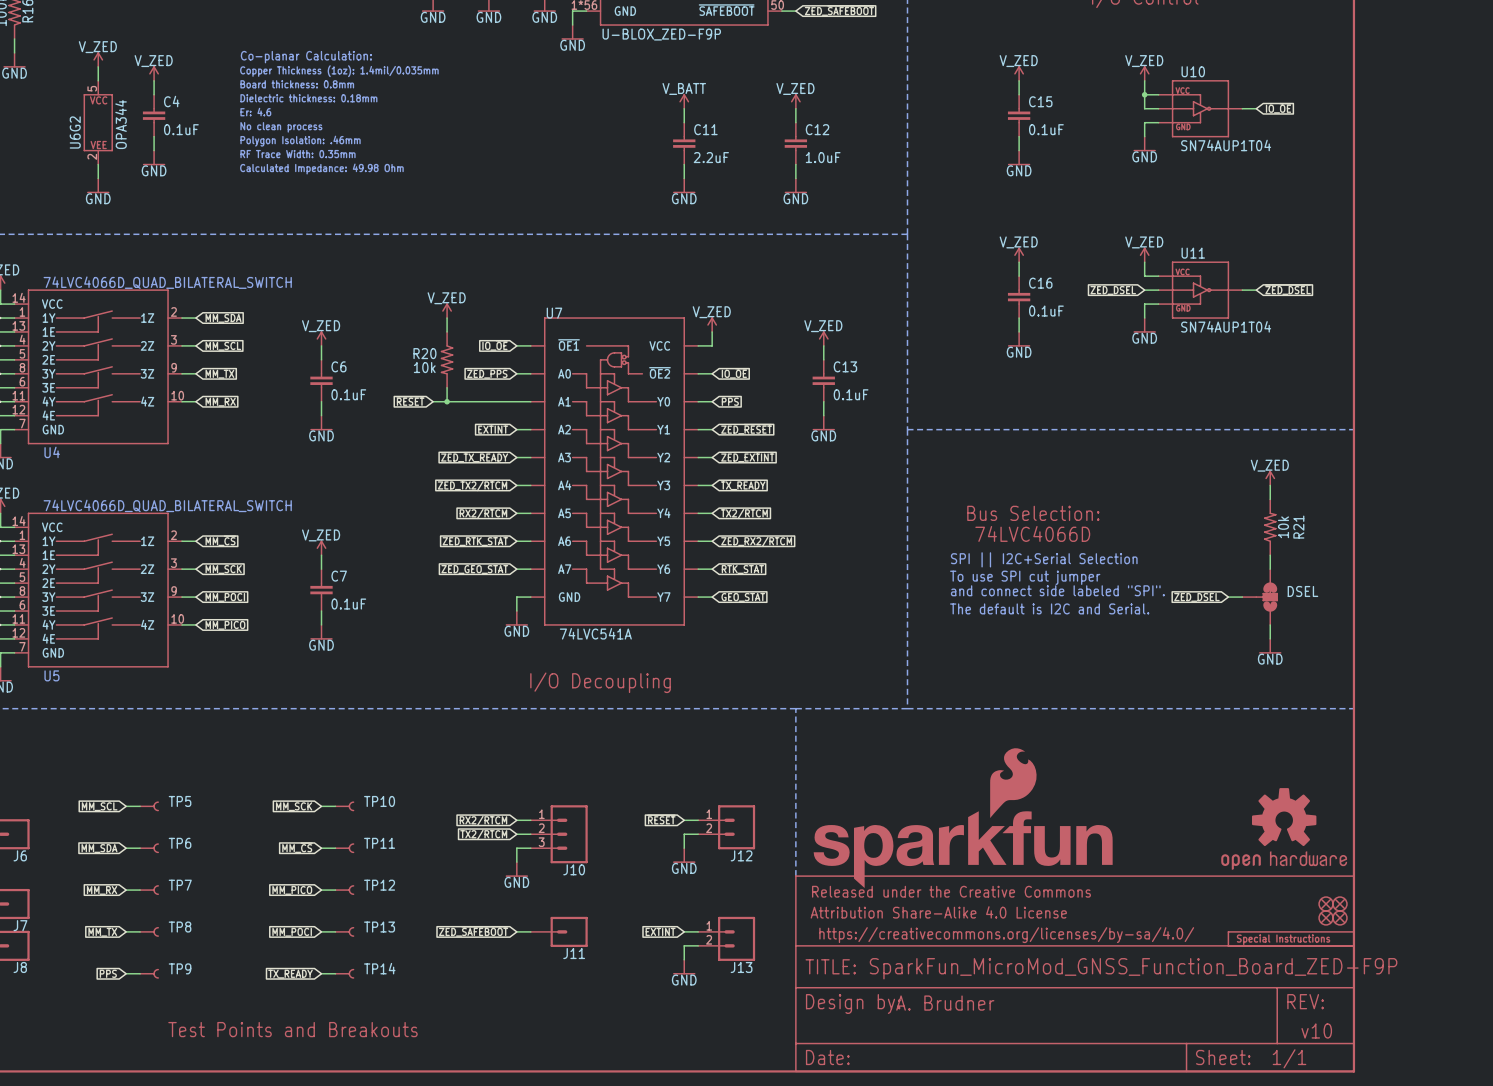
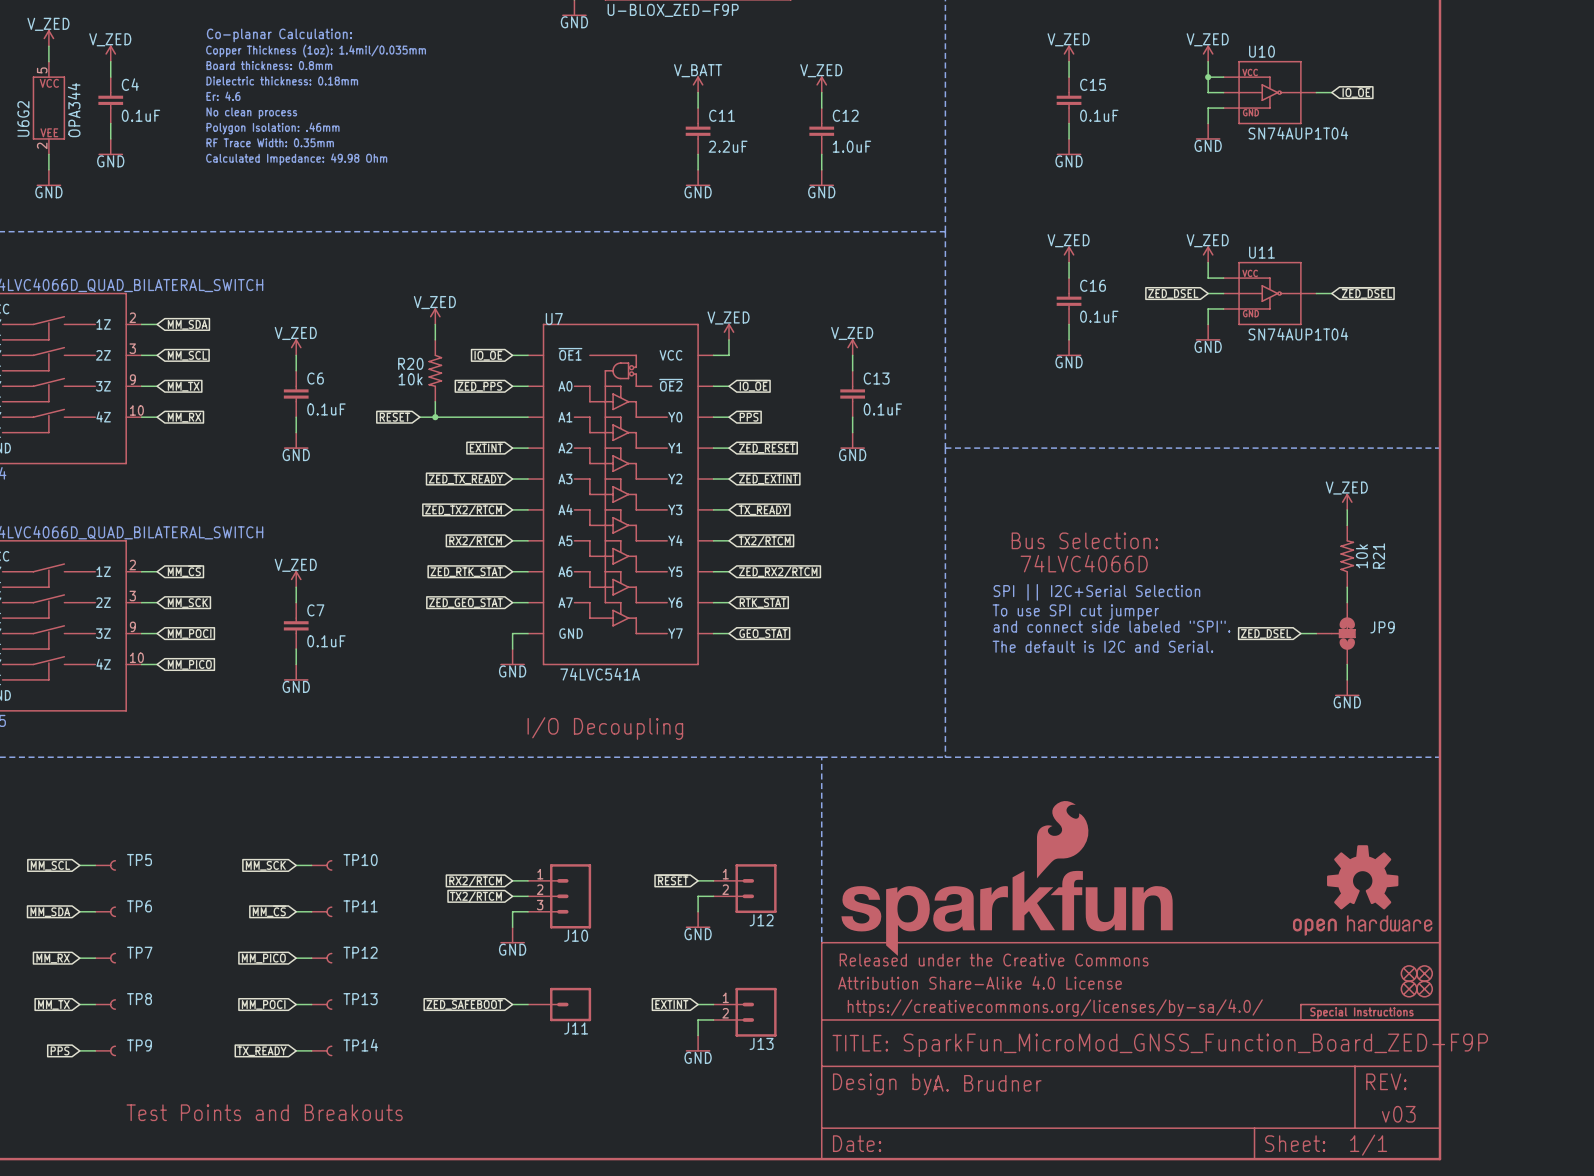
DSEL name: DSEL (1302, 591) -> JP9 (1382, 627)
text: v10 (1316, 1030) -> v03 (1398, 1114)

